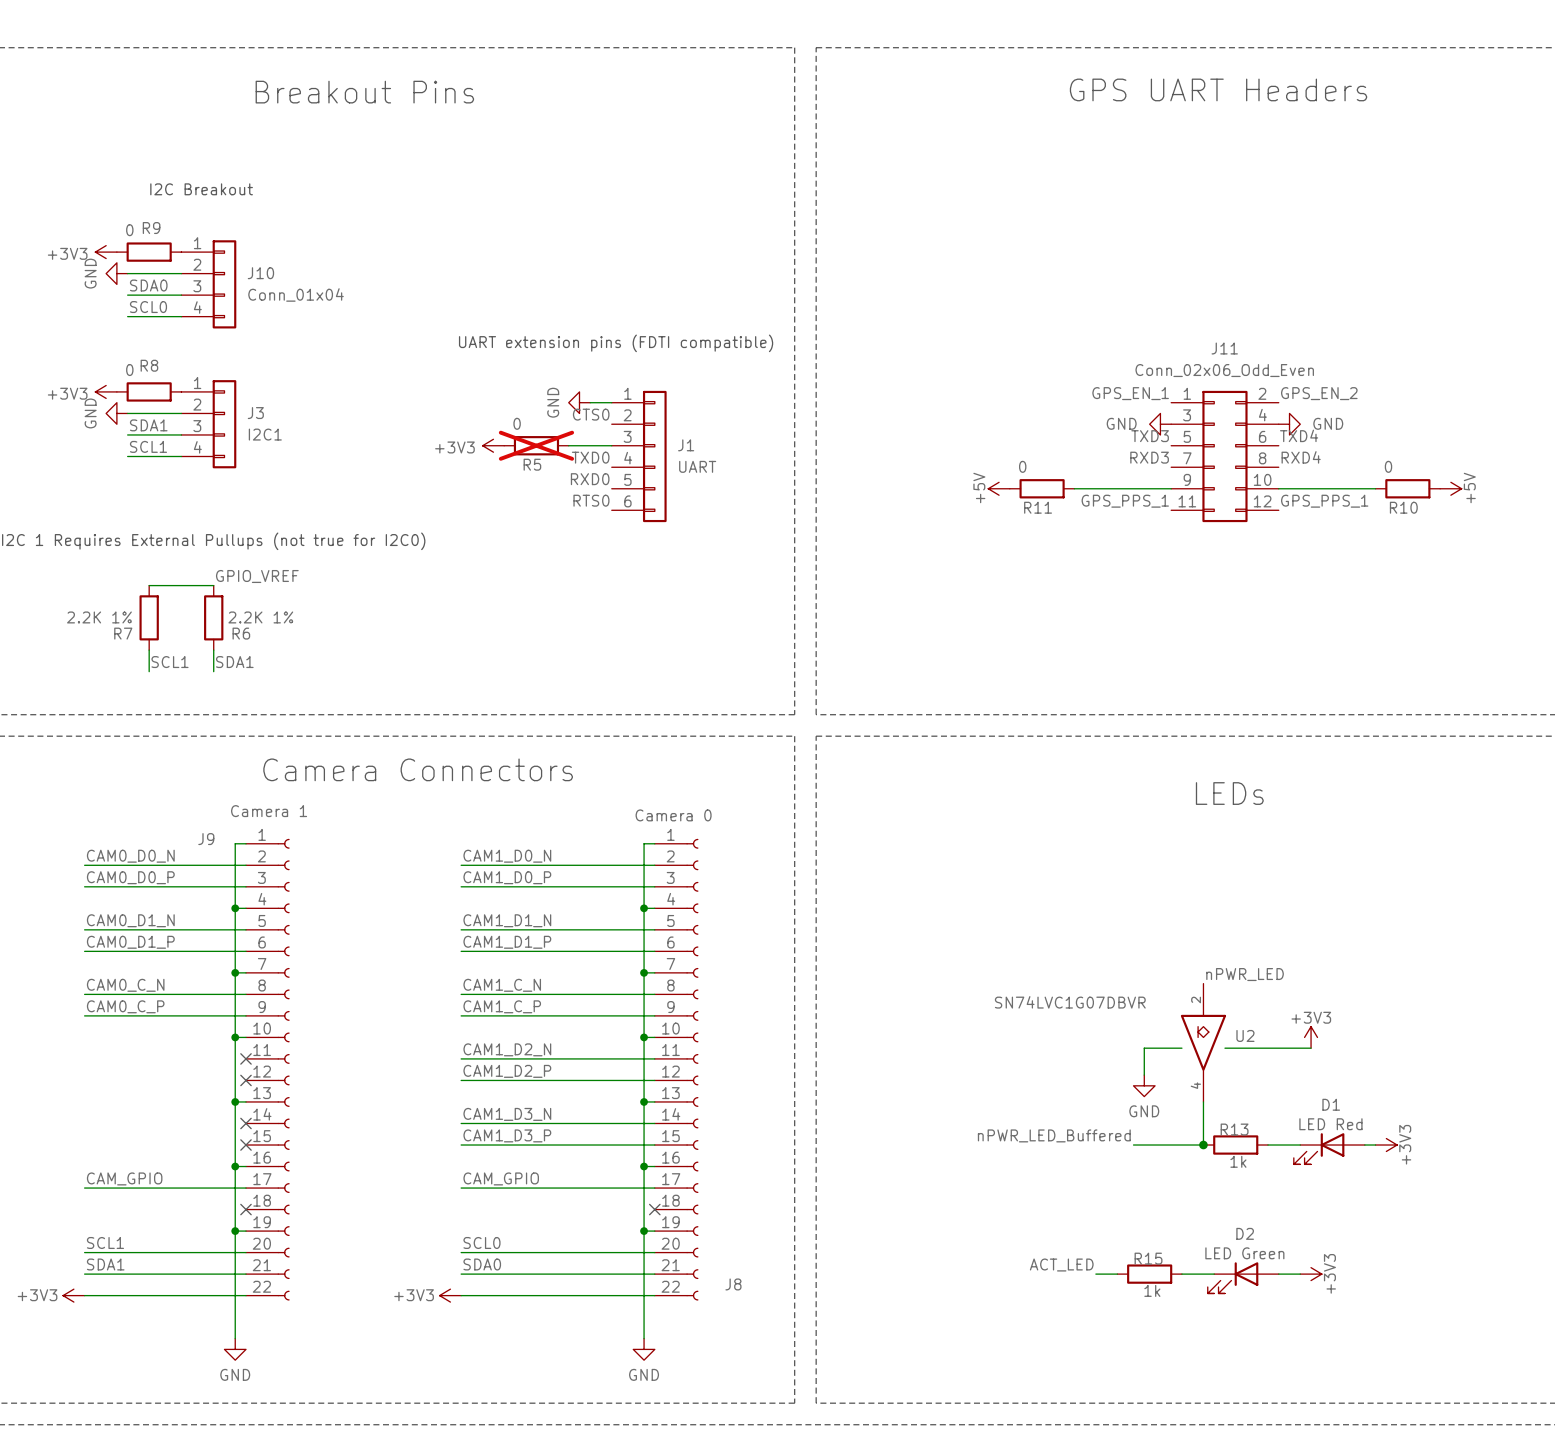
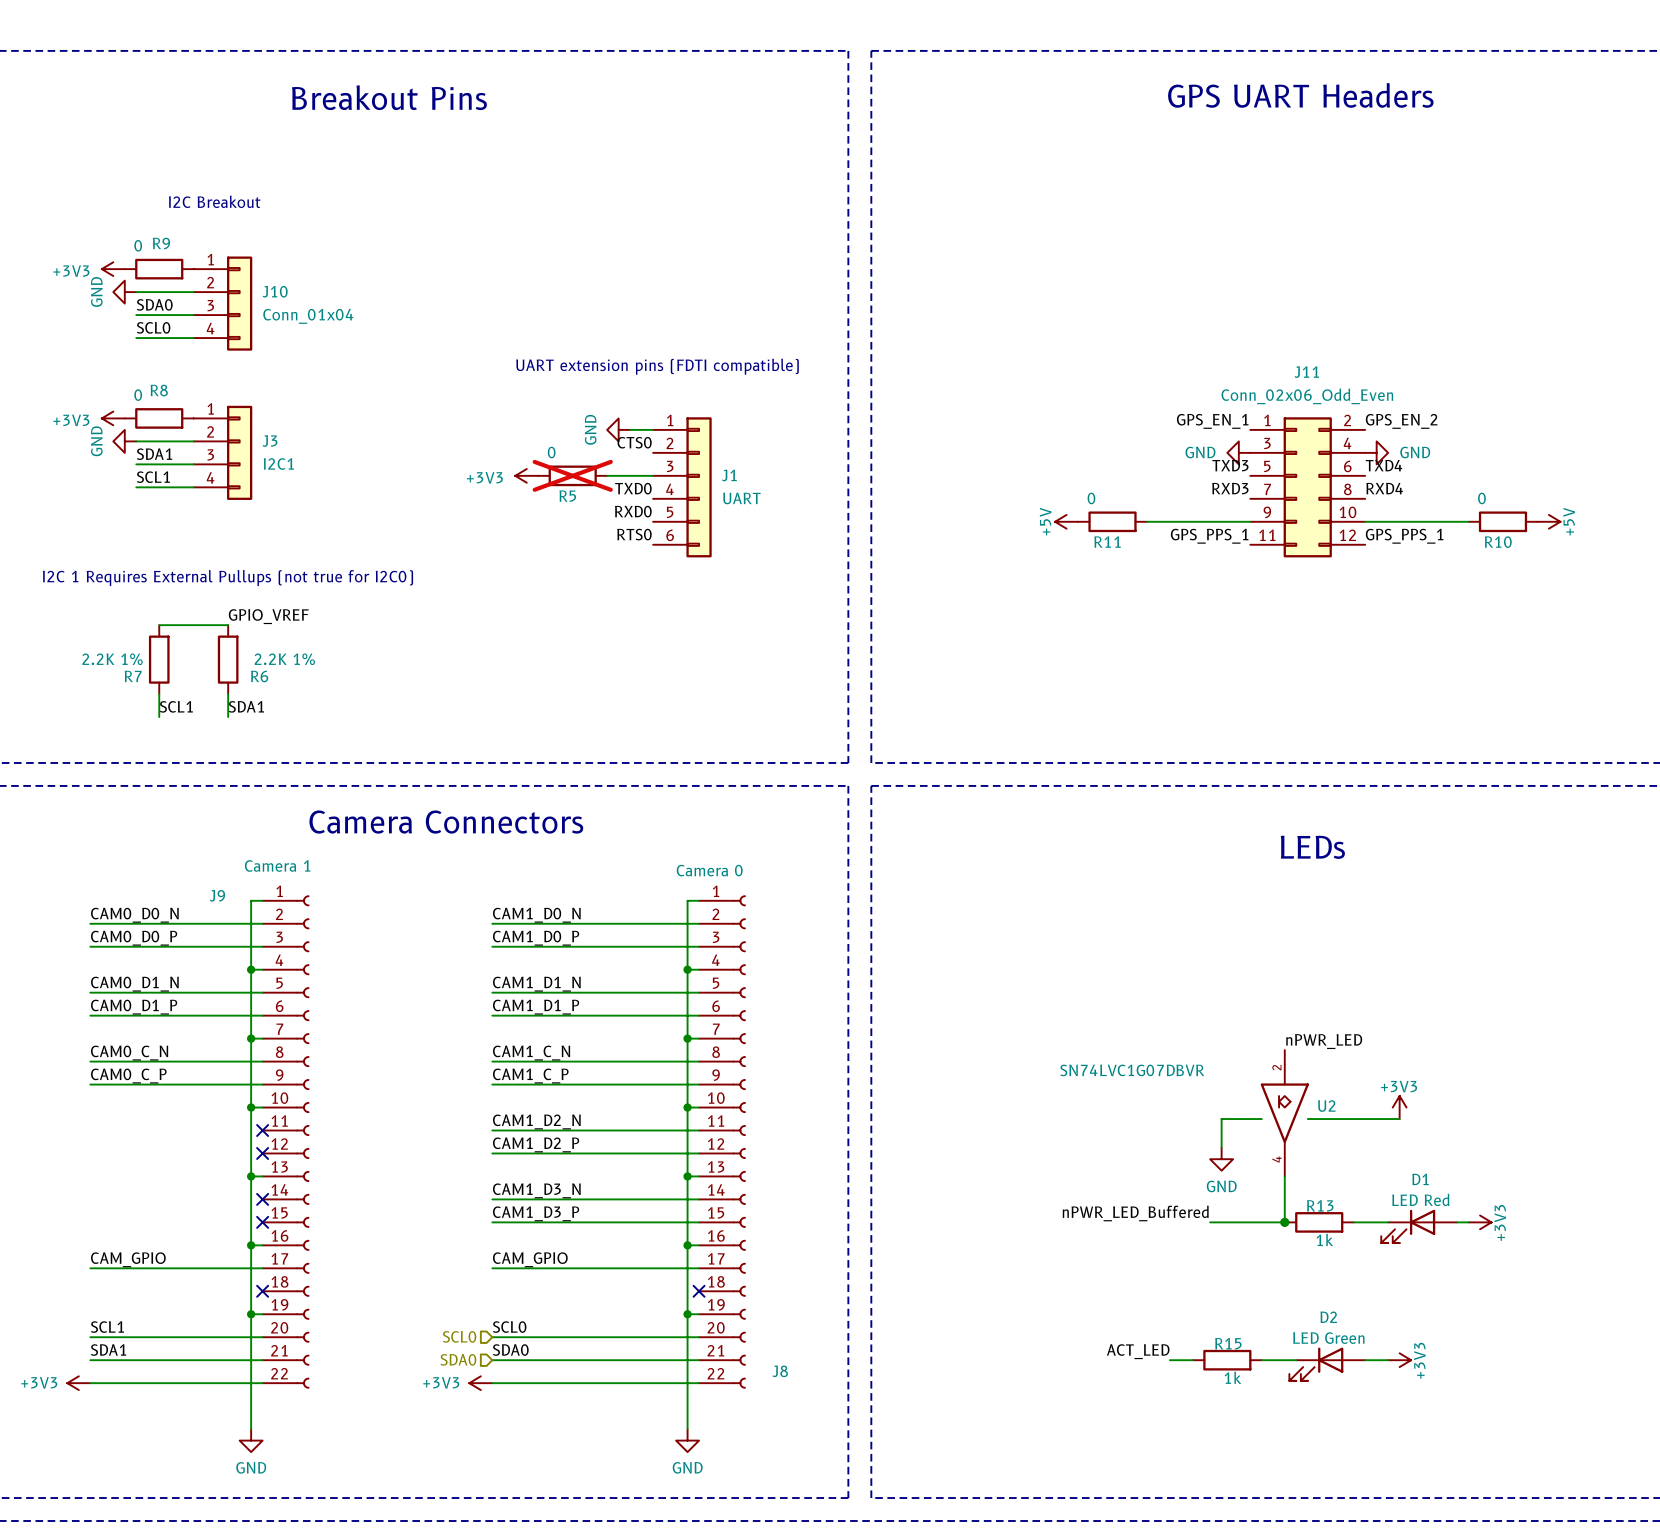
hierarchical label: none -> SCL0 (459, 1336)
hierarchical label: none -> SDA0 (458, 1359)

